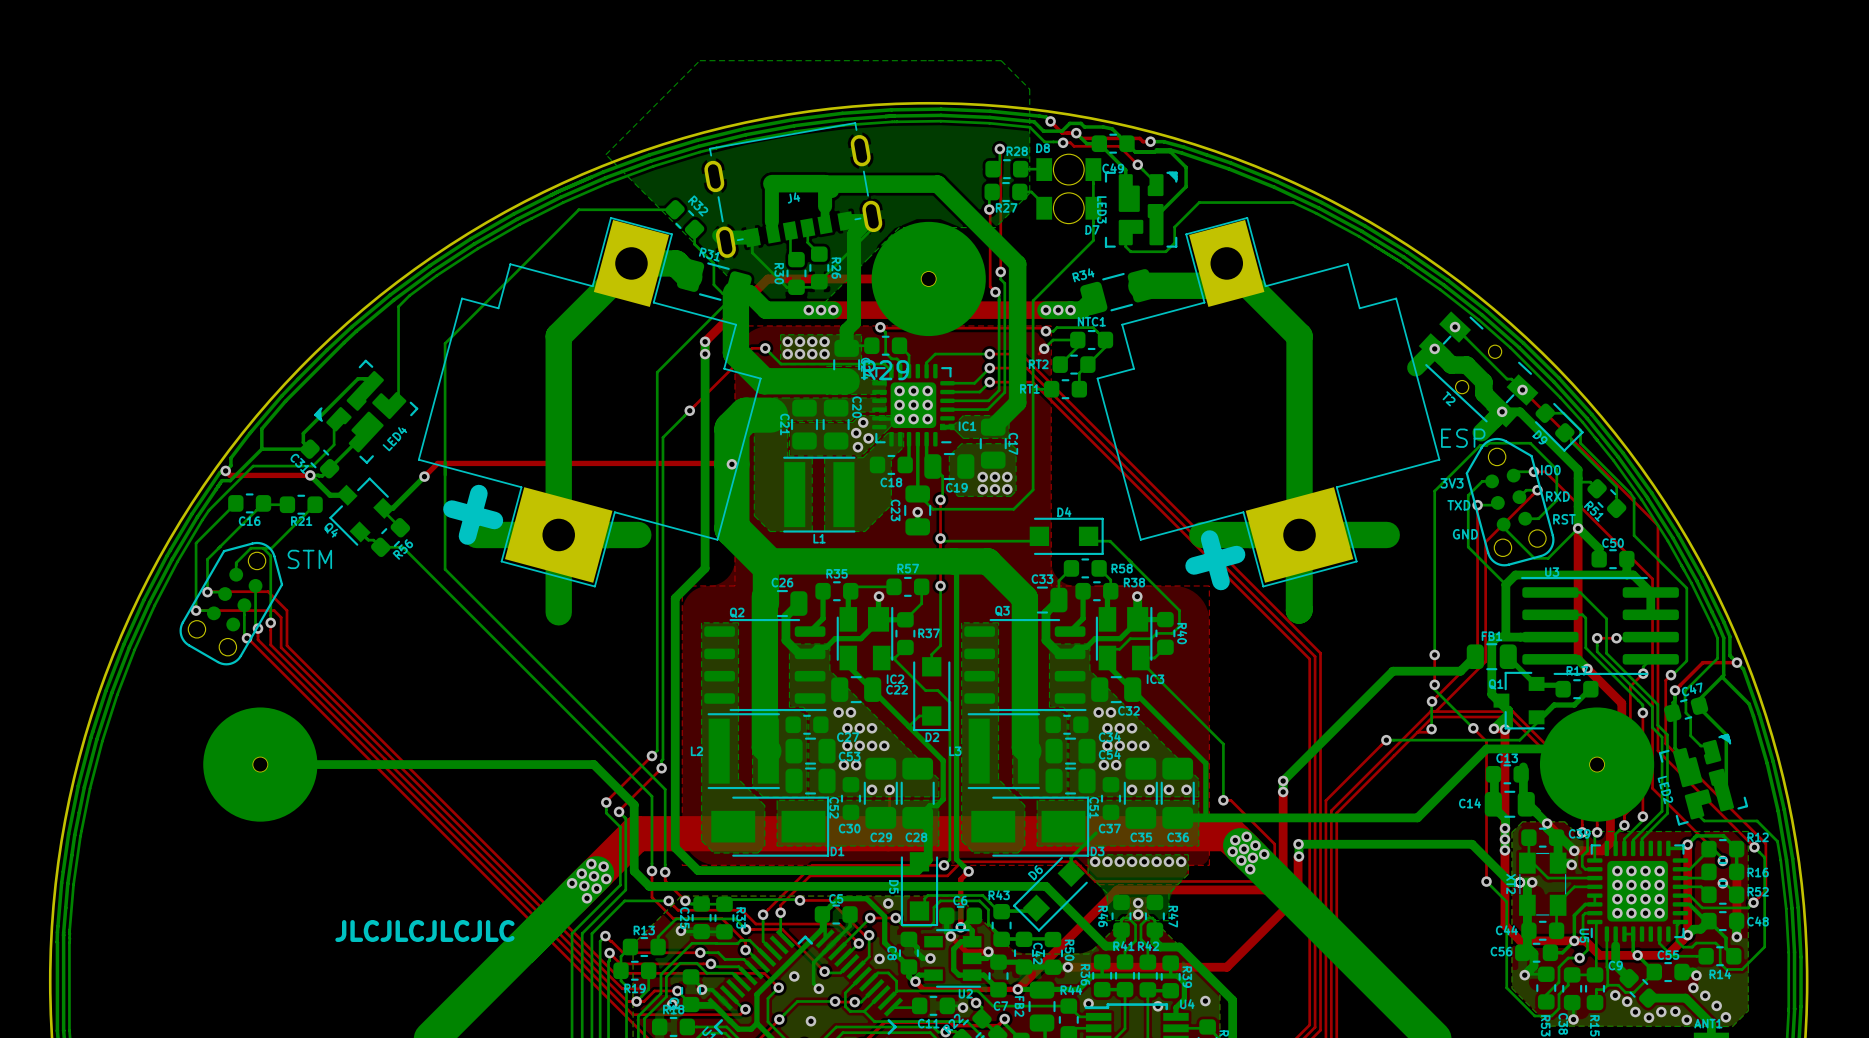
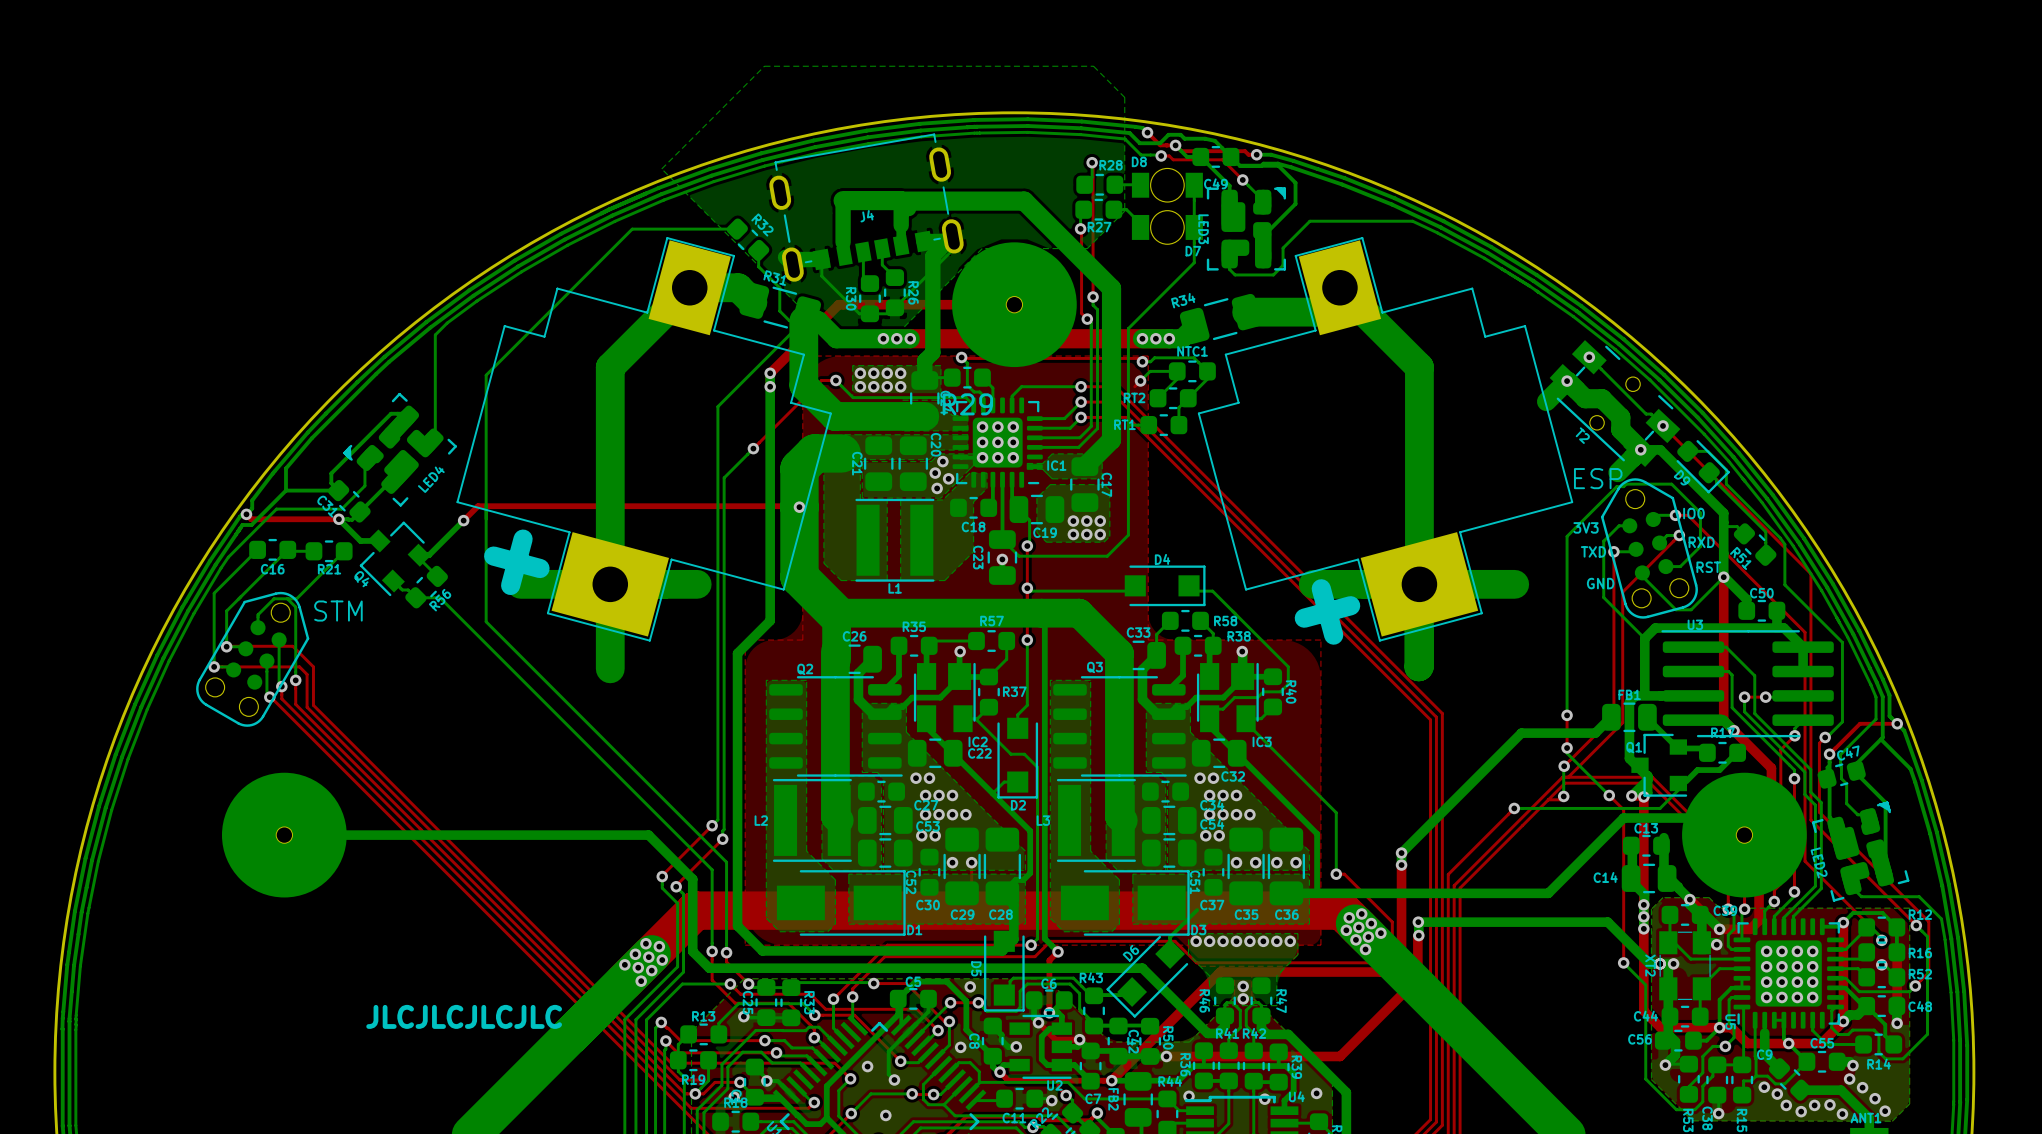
LED3 footprint: [1104, 171, 1178, 248] -> [1206, 187, 1286, 271]
LED4 footprint: [314, 359, 419, 464] -> [343, 392, 457, 507]
LED2 footprint: [1658, 733, 1749, 826] -> [1811, 801, 1910, 902]

